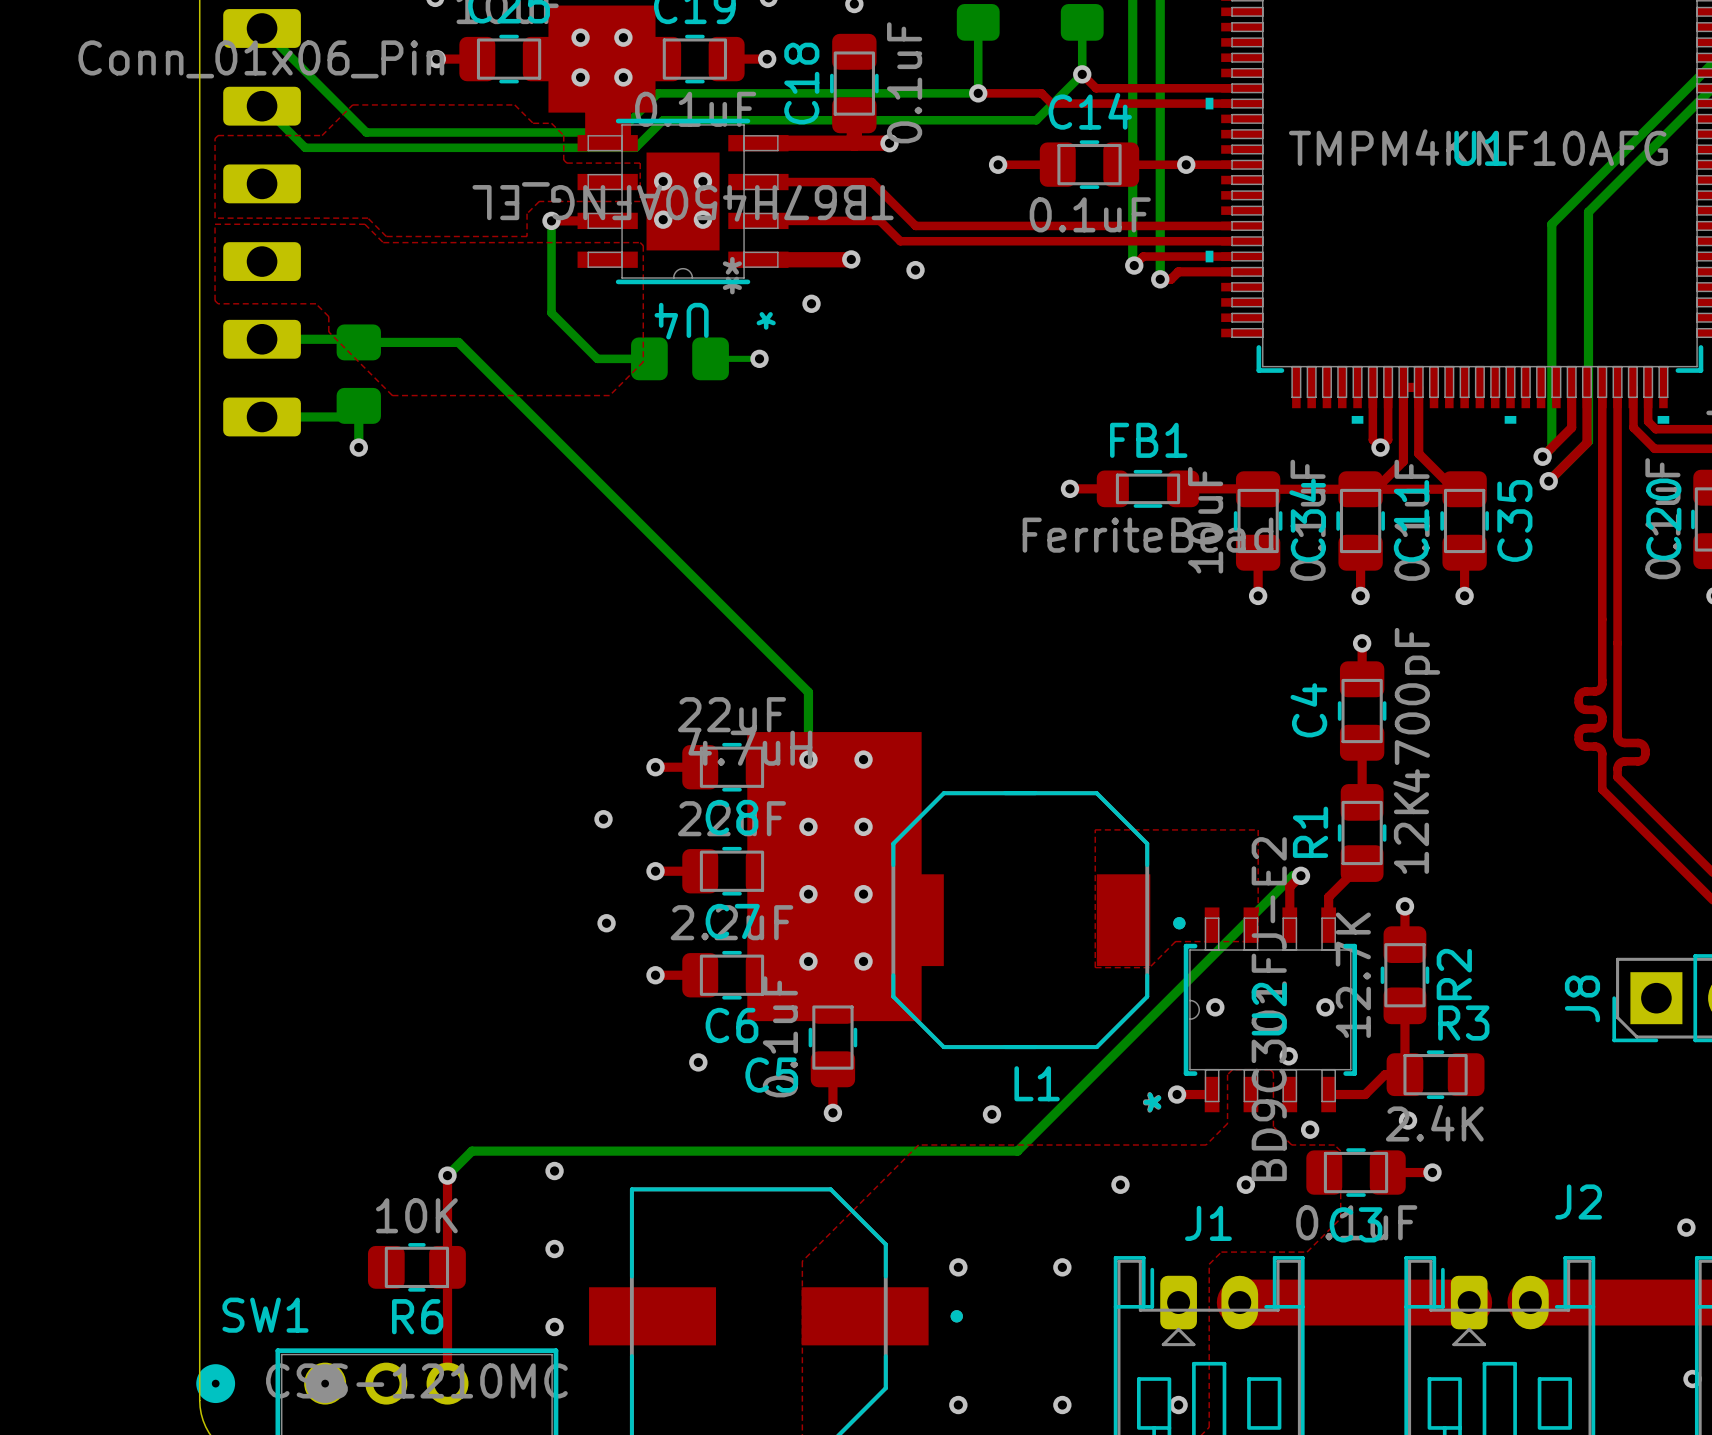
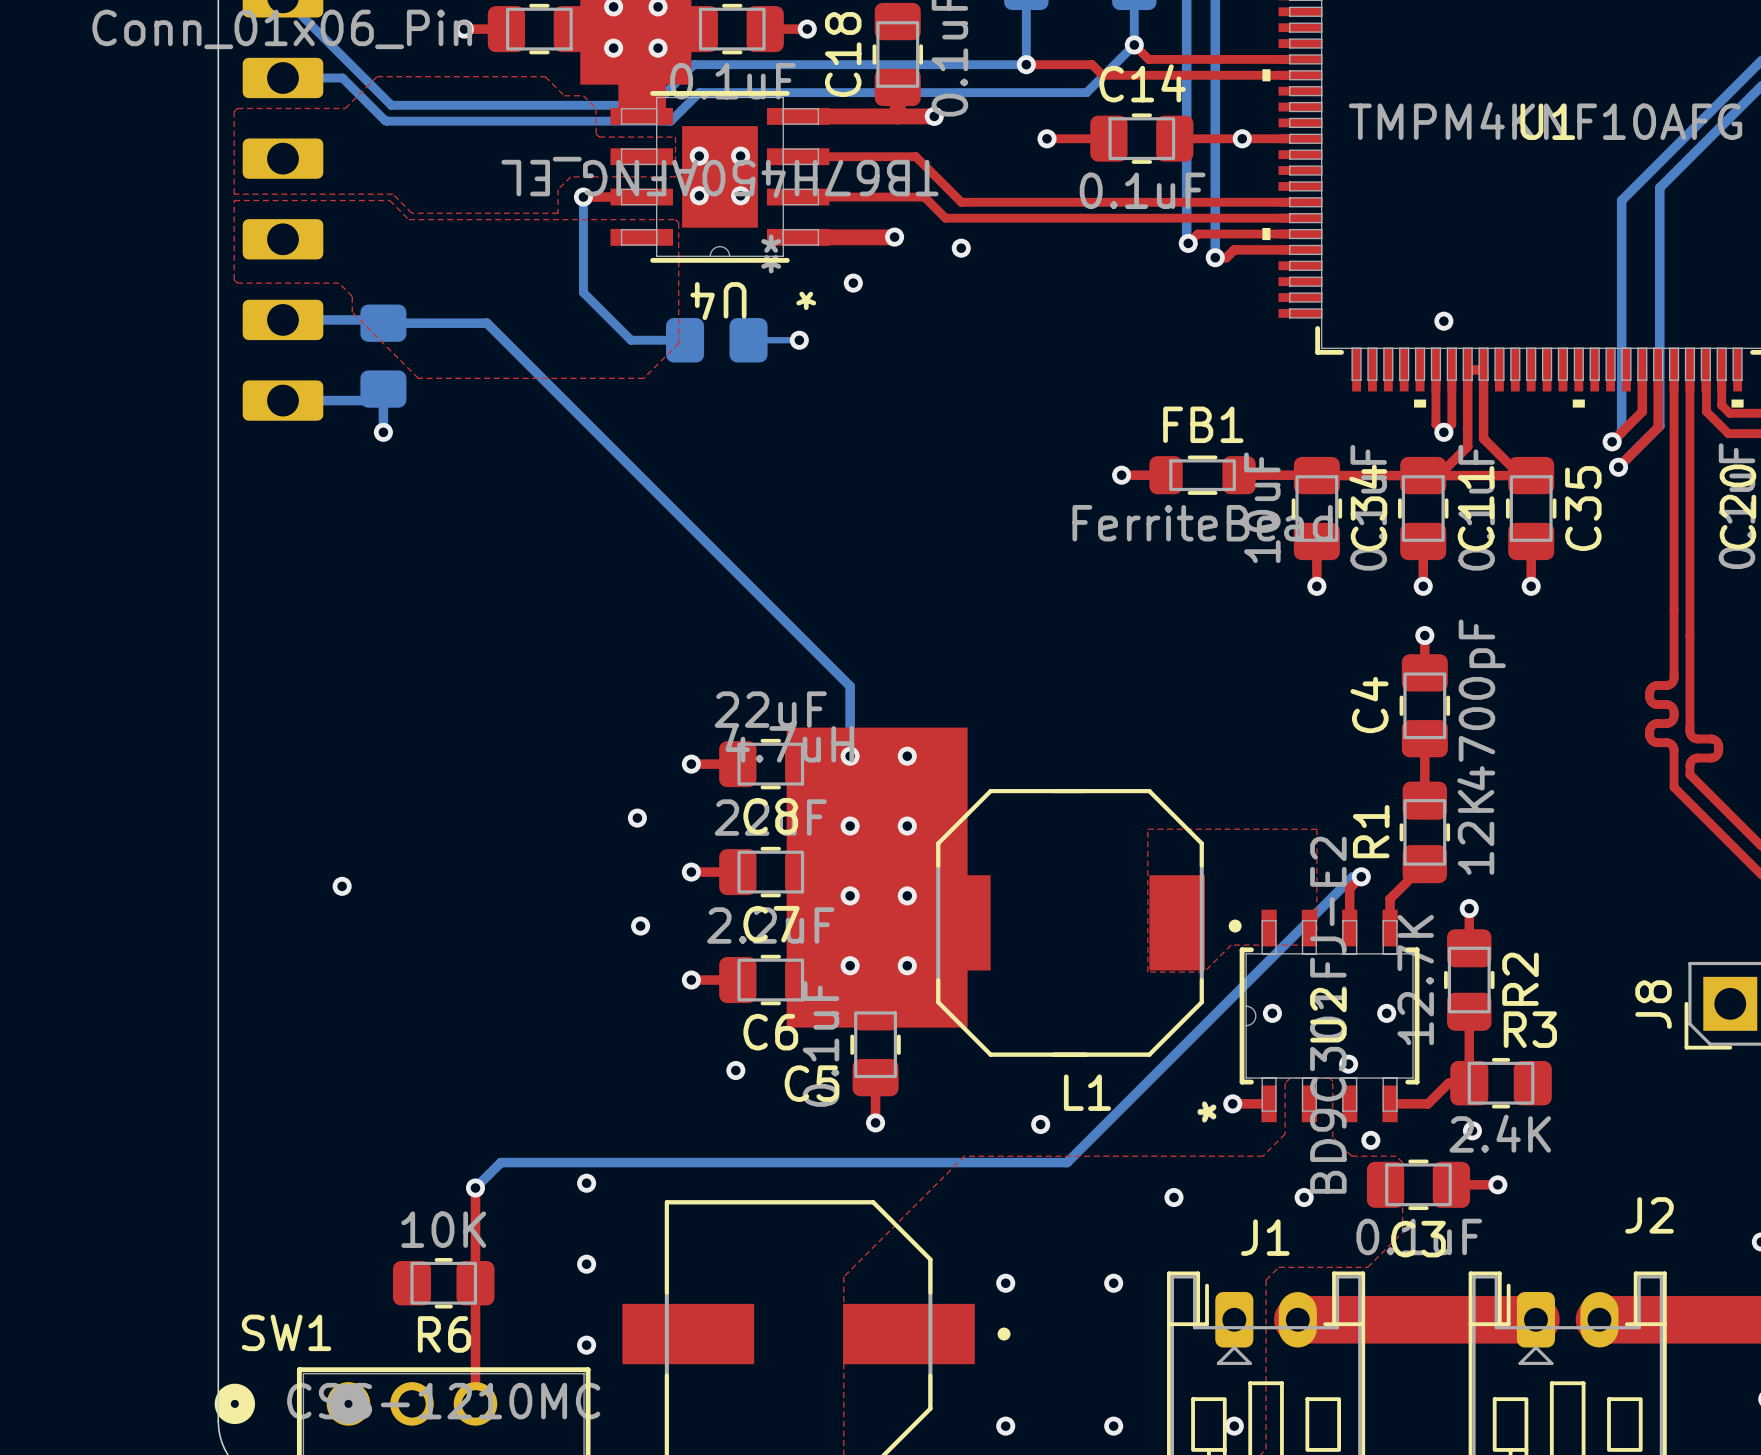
bottom track: (263, 106) (305, 147) (361, 147) -> (284, 77) (342, 77) (386, 121)
via: none -> (1443, 321)
via: none -> (342, 886)

